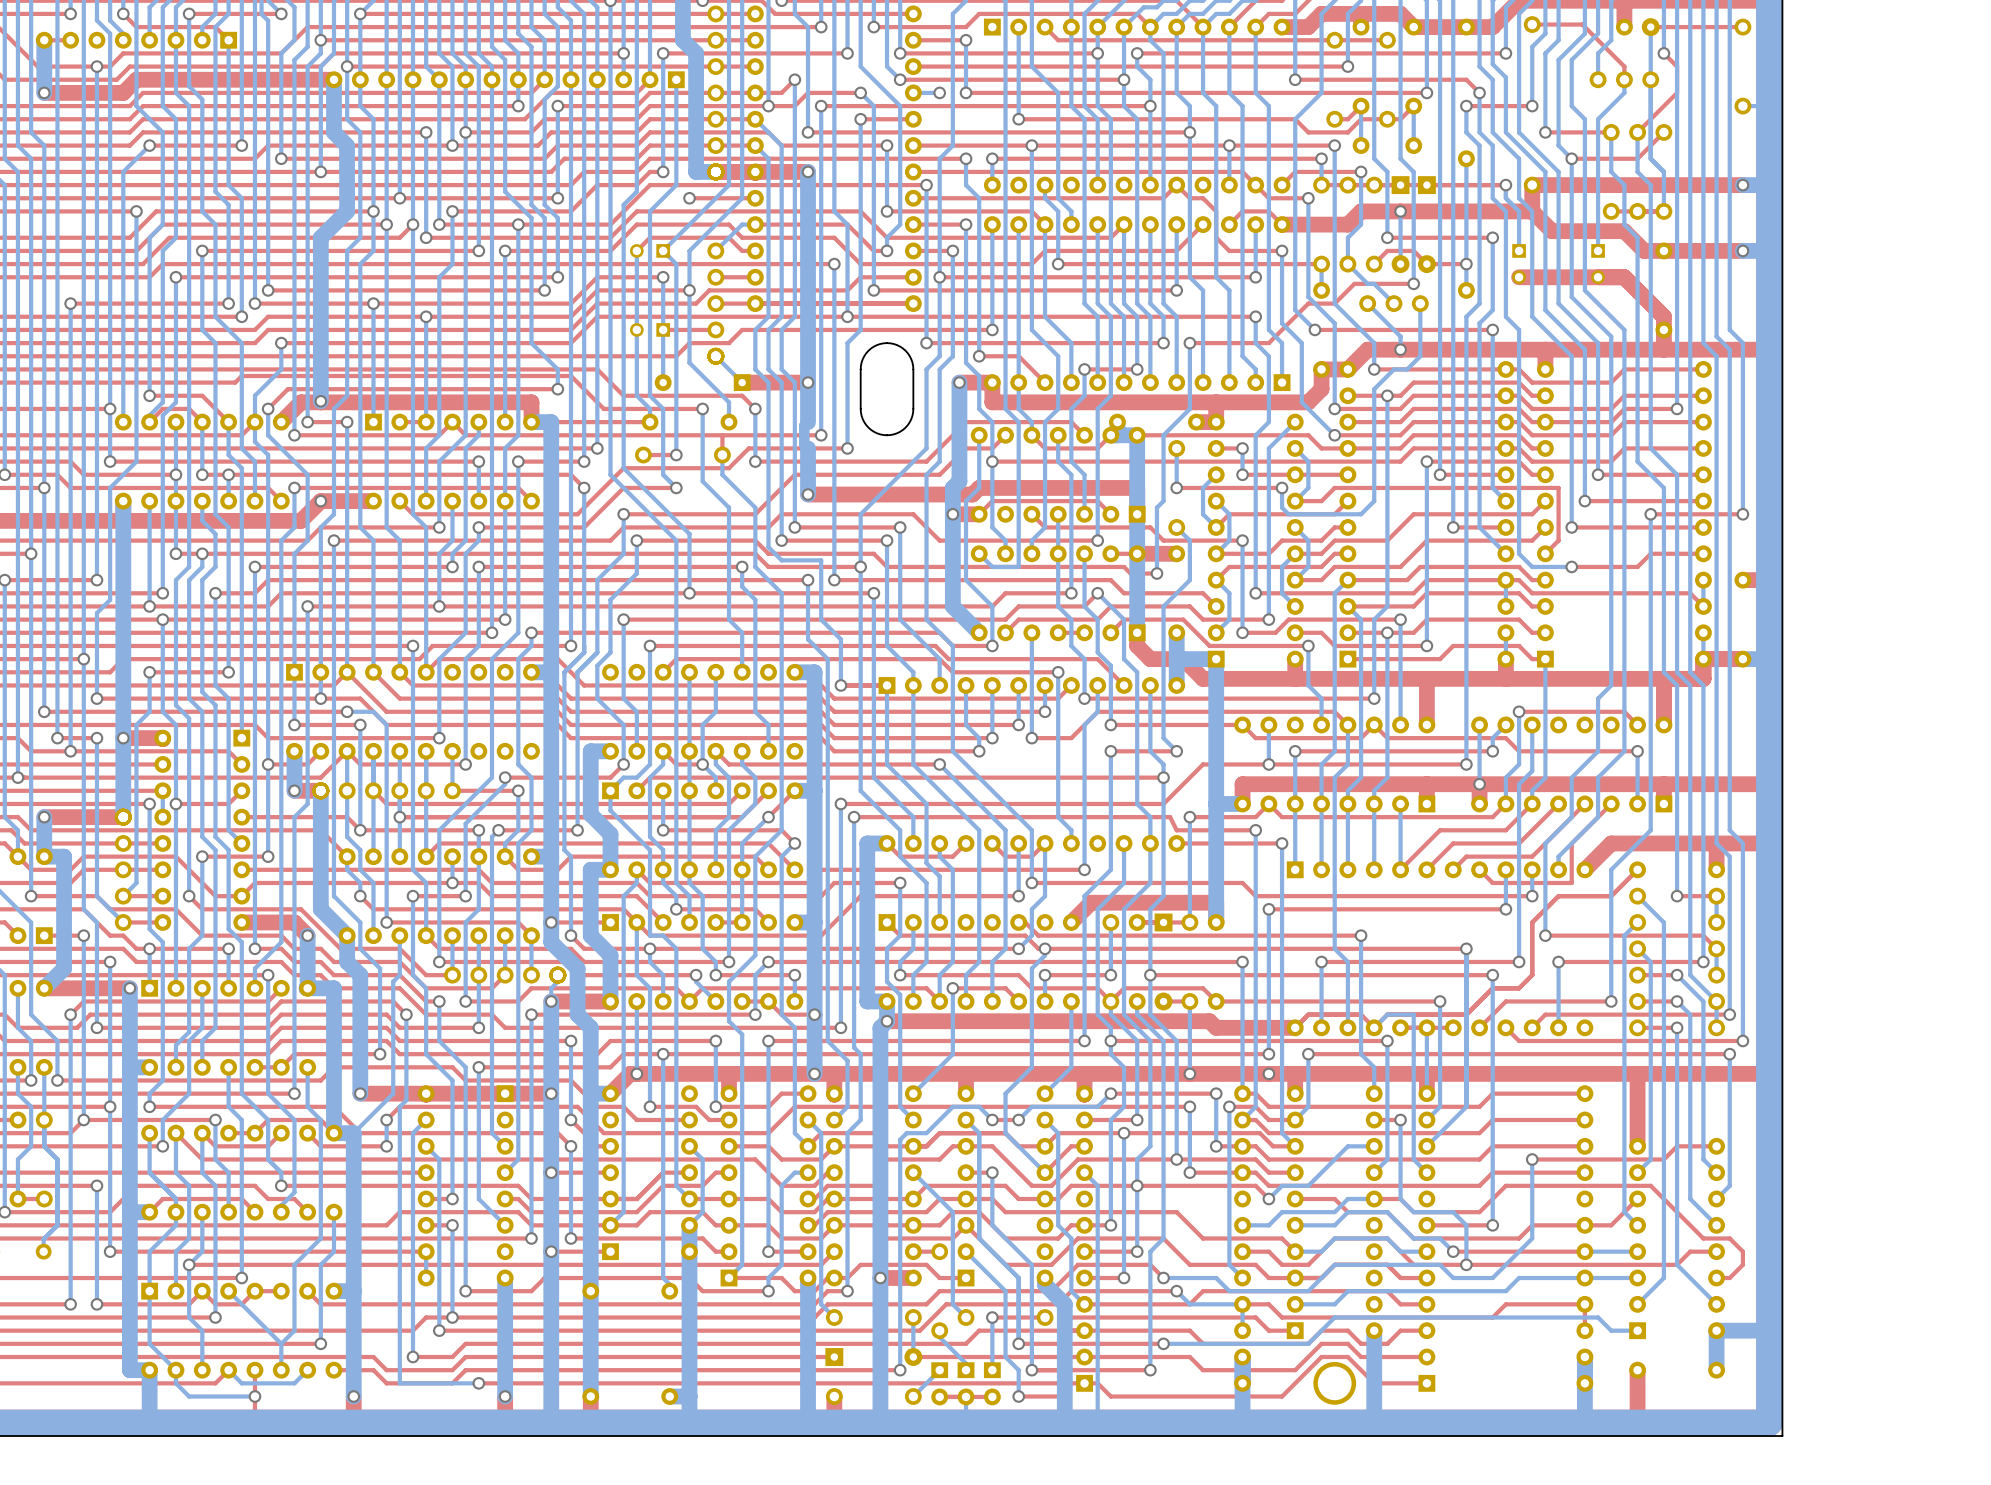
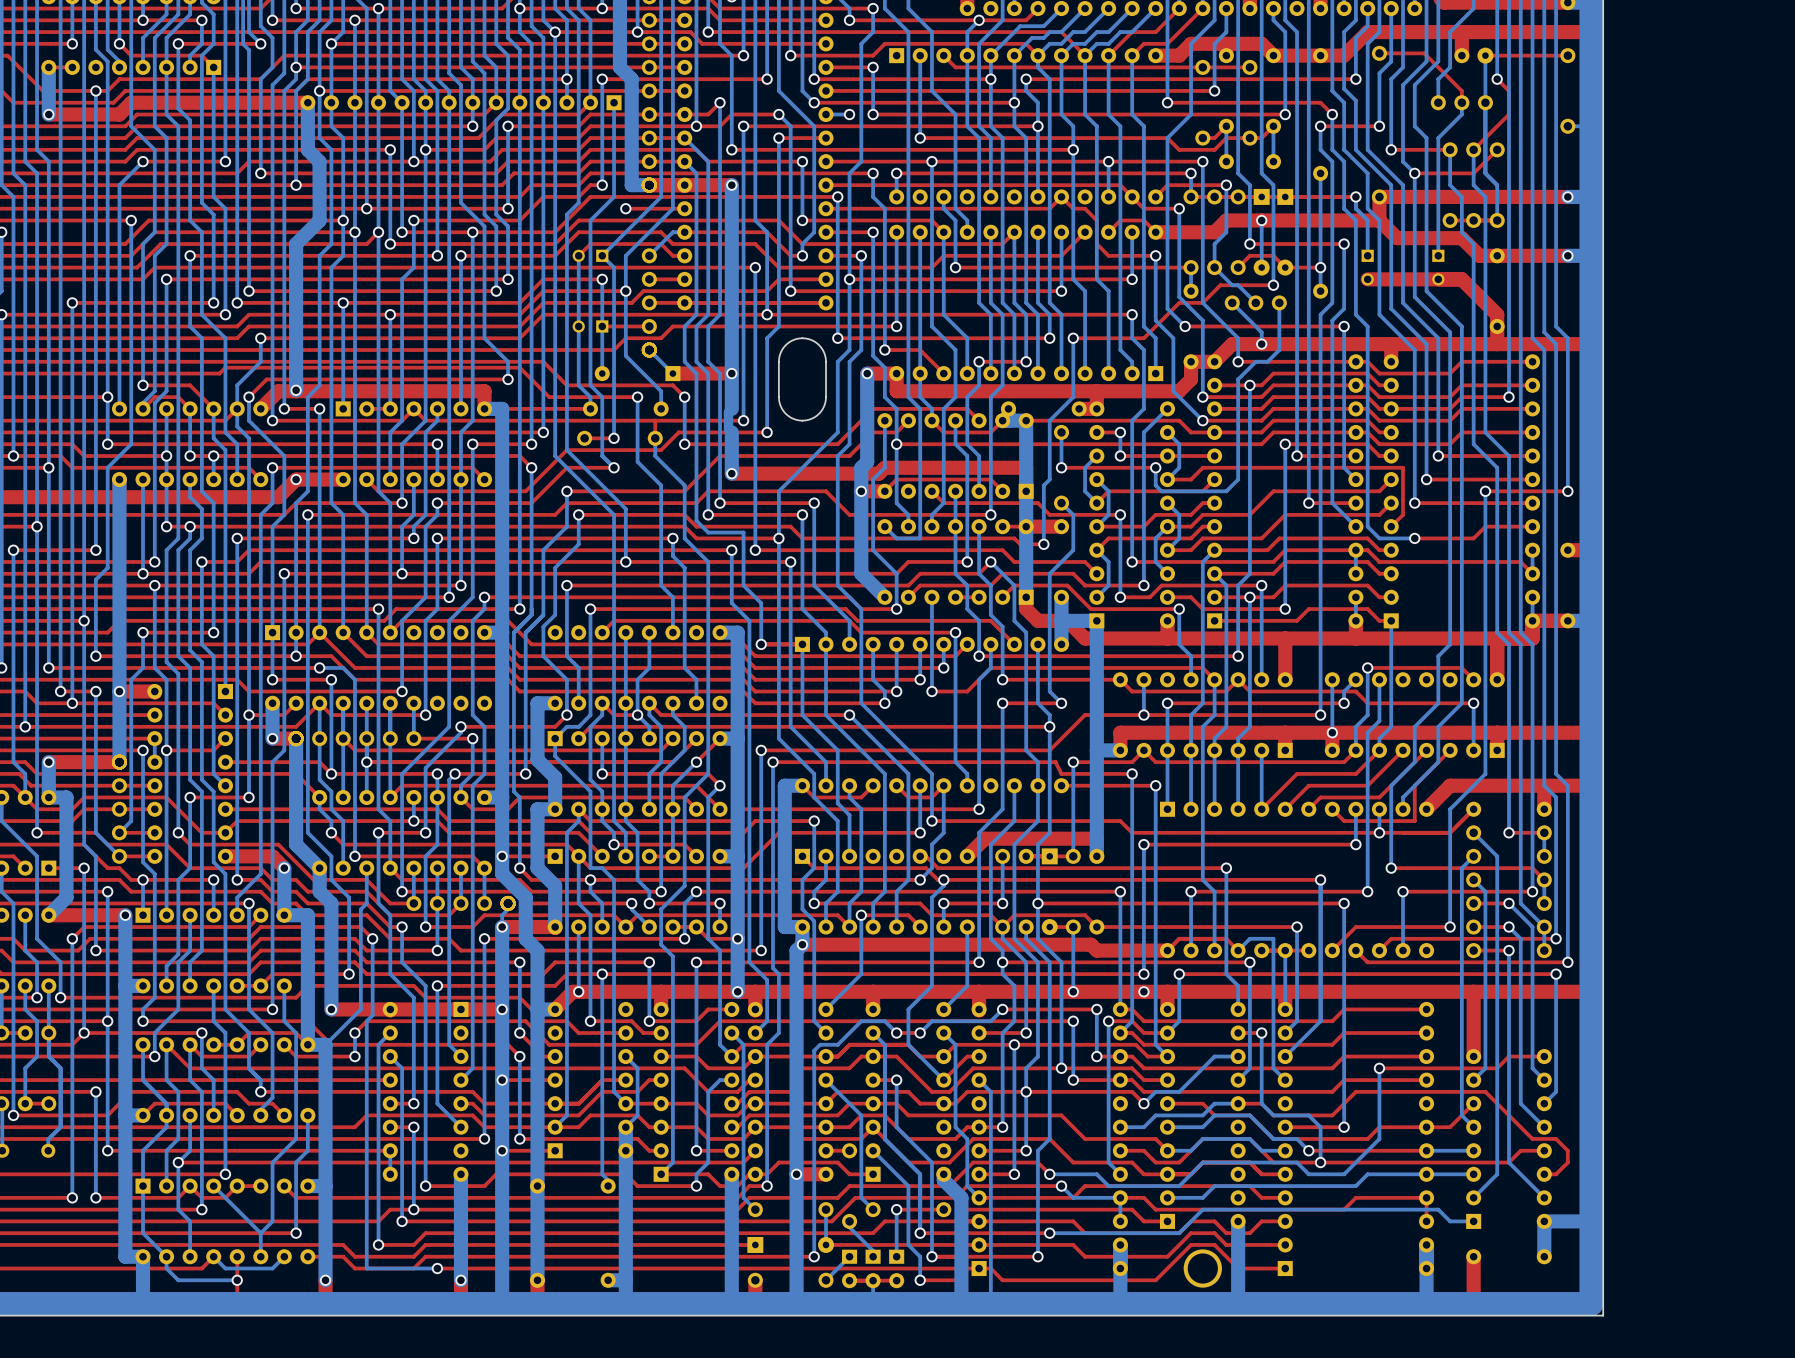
top track: (1558, 896) (1532, 922) (1532, 975) (1519, 988) (1492, 988) (1466, 1014) (1387, 1014) (1374, 1027) -> (1403, 832) (1379, 832)

